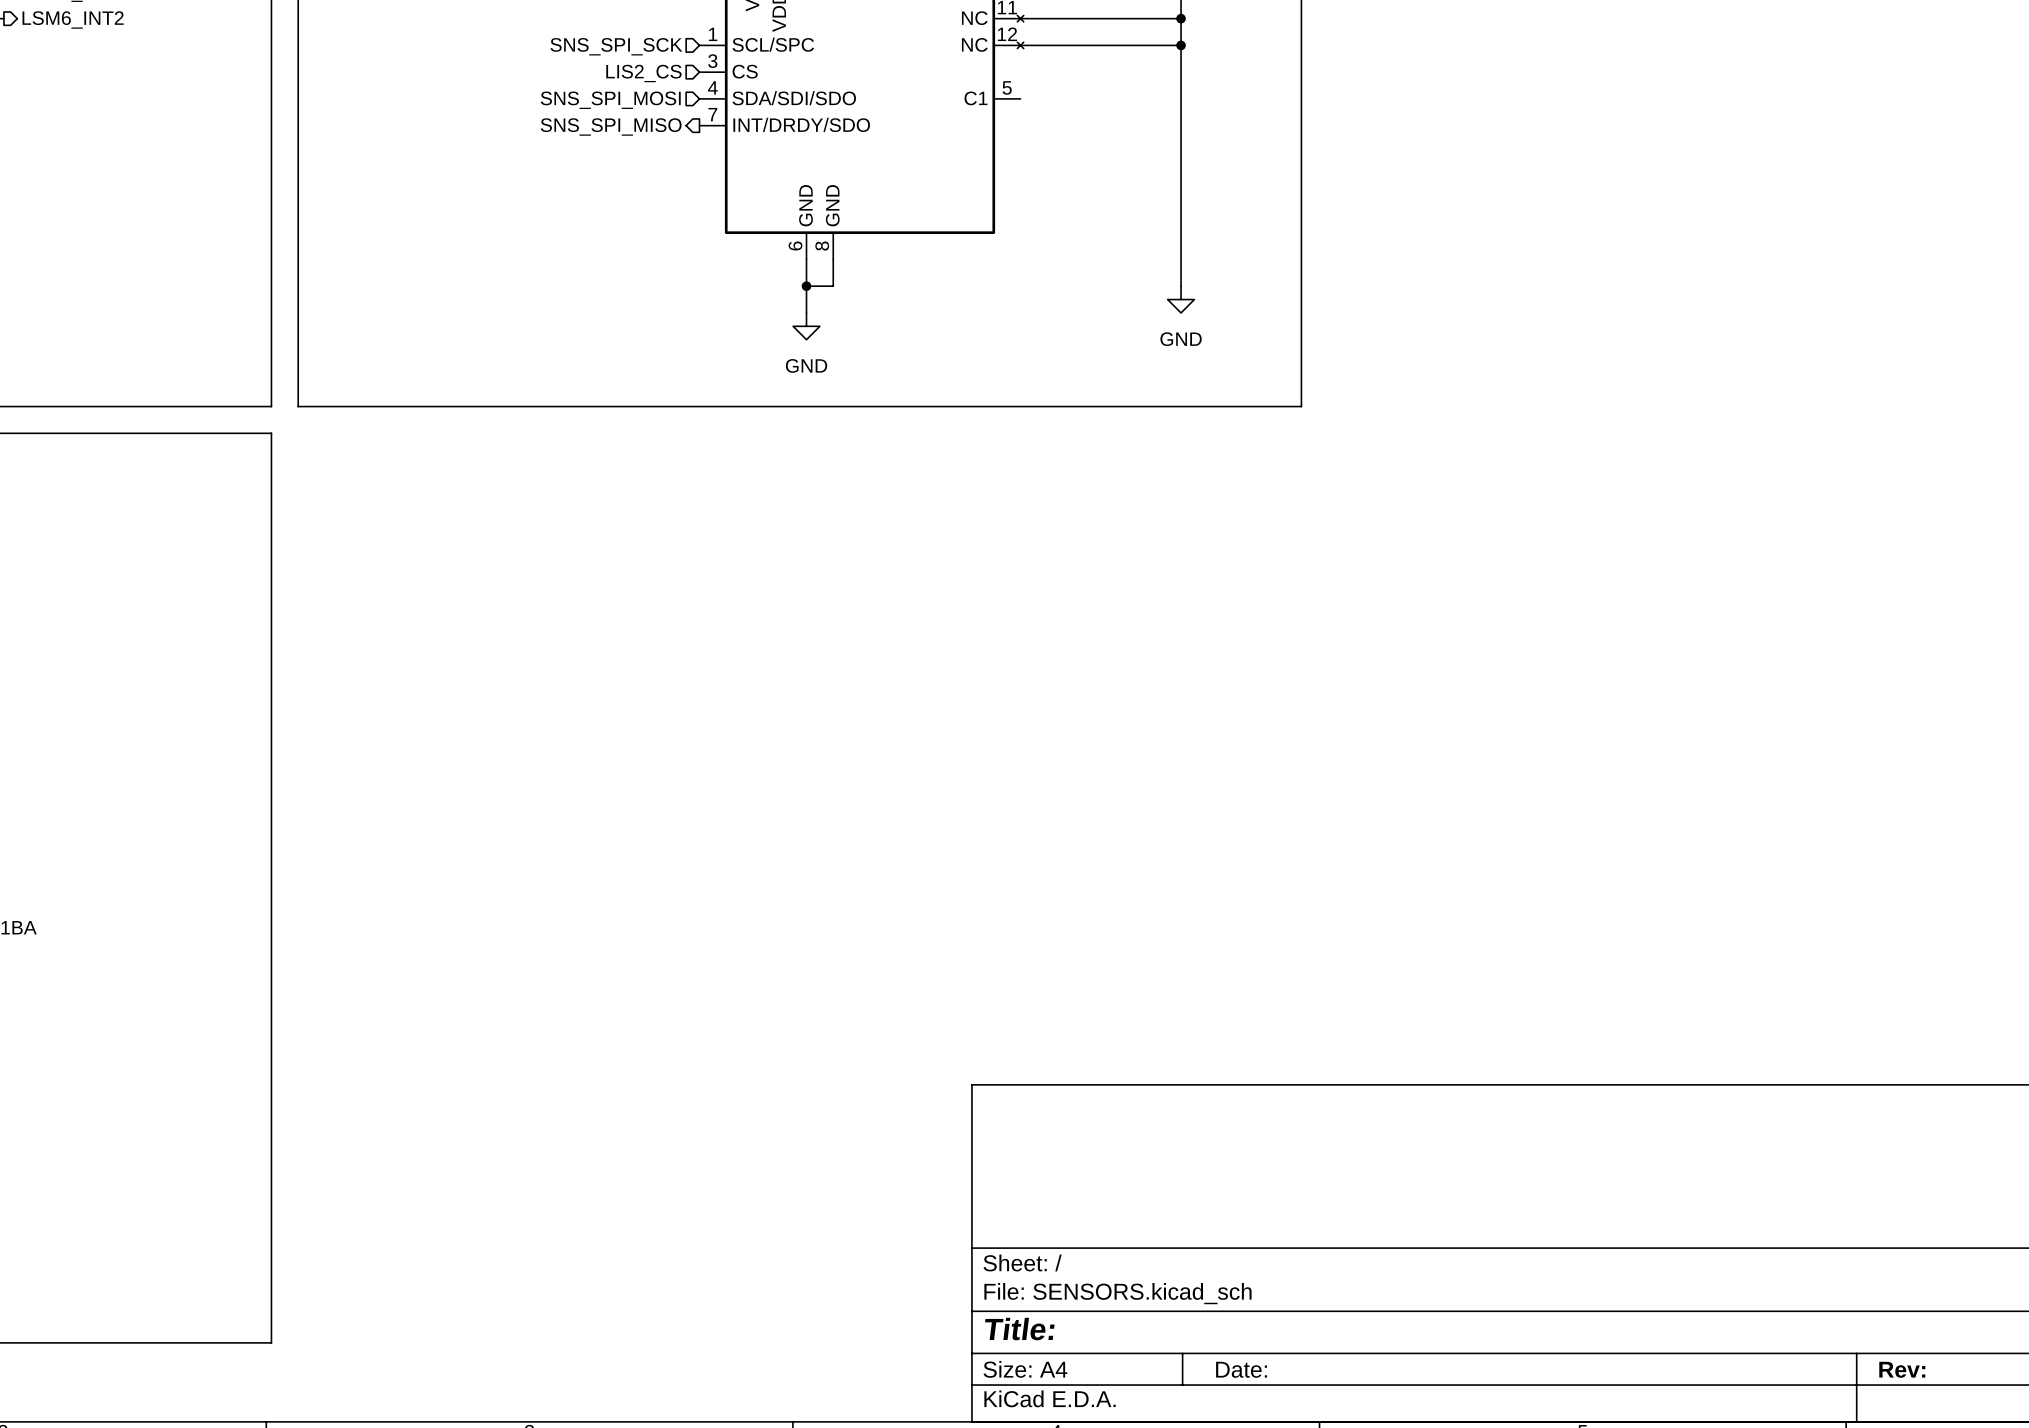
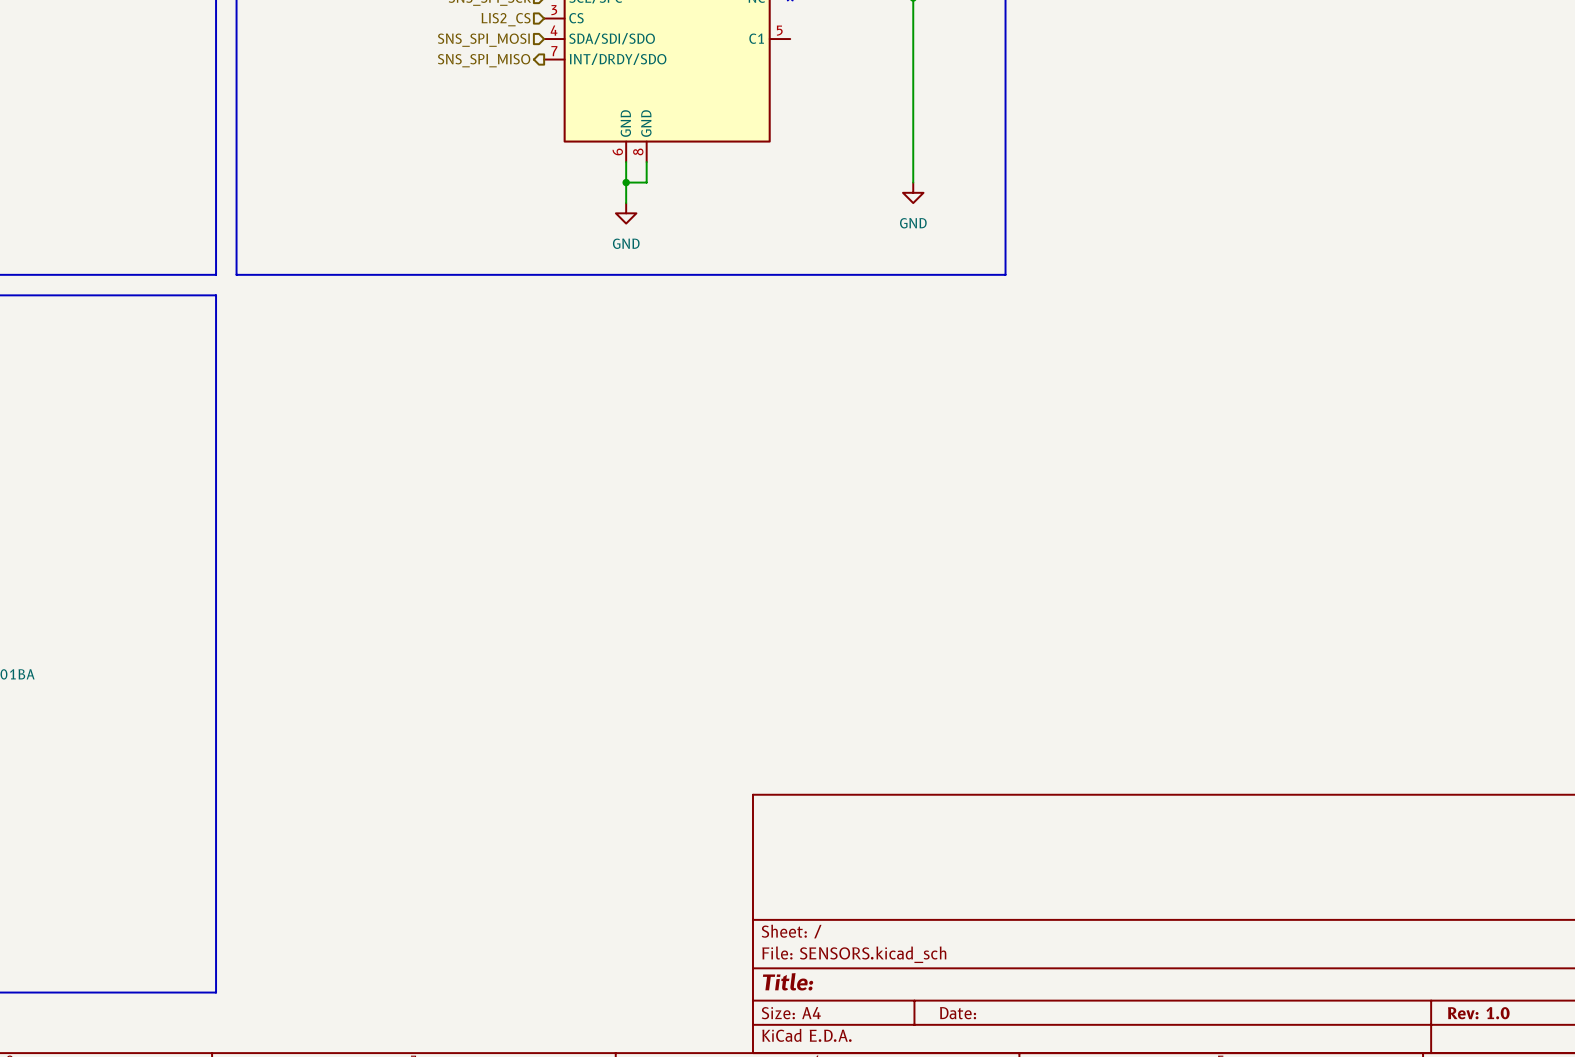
title block: Rev: (1902, 1369) -> Rev: 1.0 (1478, 1013)

